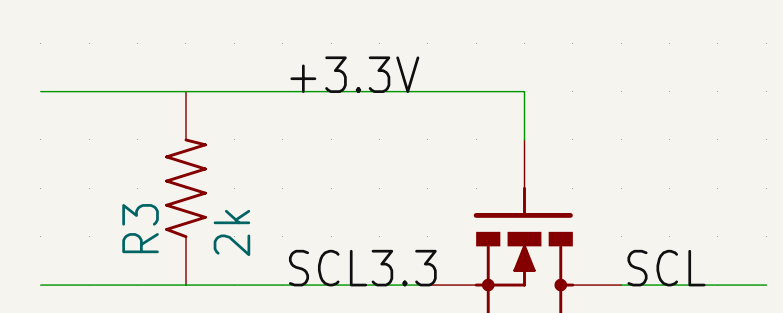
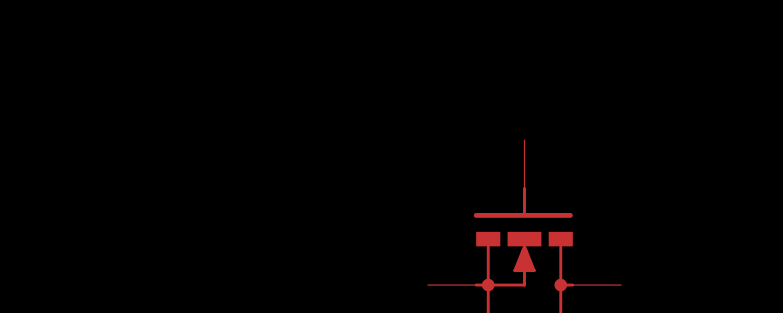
label: +3.3V (354, 74) -> none
wire: (40, 91) (524, 91) (524, 139) -> none
R3: 2k (185, 188) -> none
label: SCL3.3 (362, 268) -> none
label: SCL (666, 268) -> none
wire: (40, 285) (427, 285) -> none
wire: (621, 285) (766, 285) -> none

